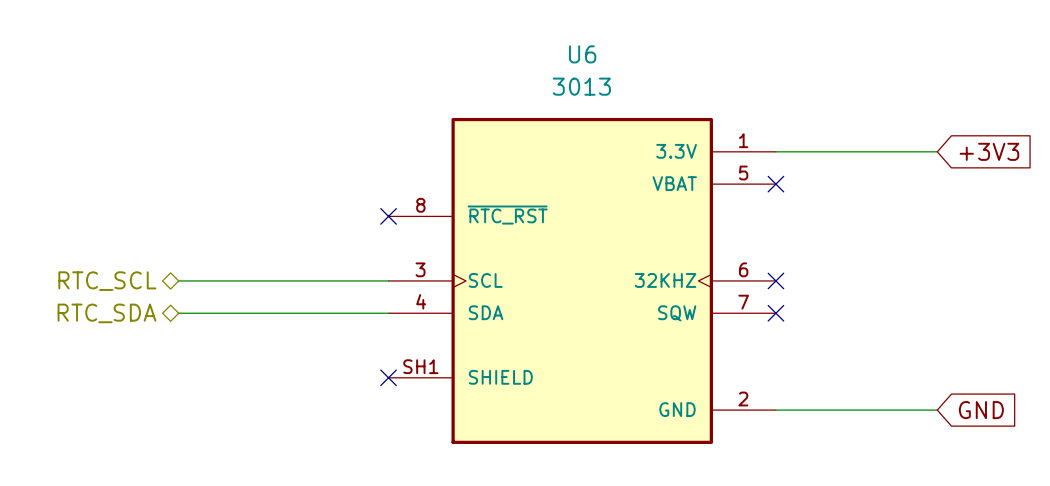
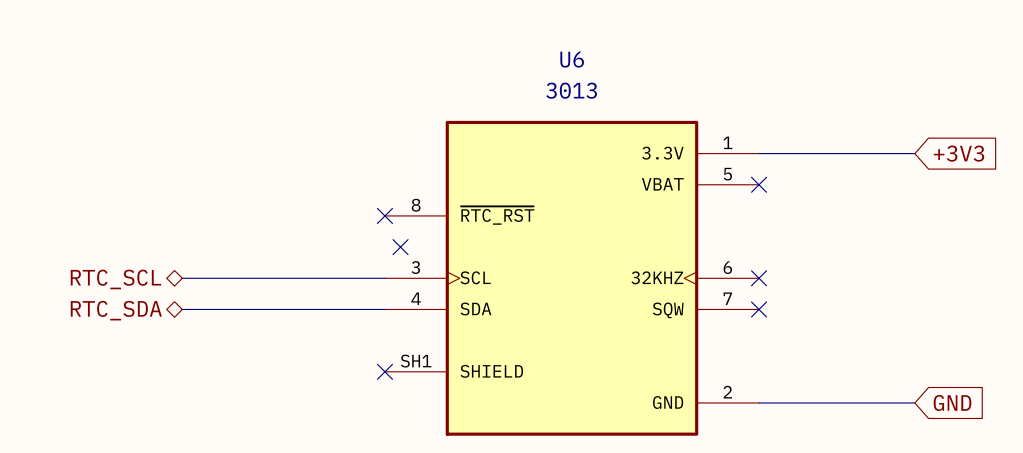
no-connect mark: none -> (400, 247)

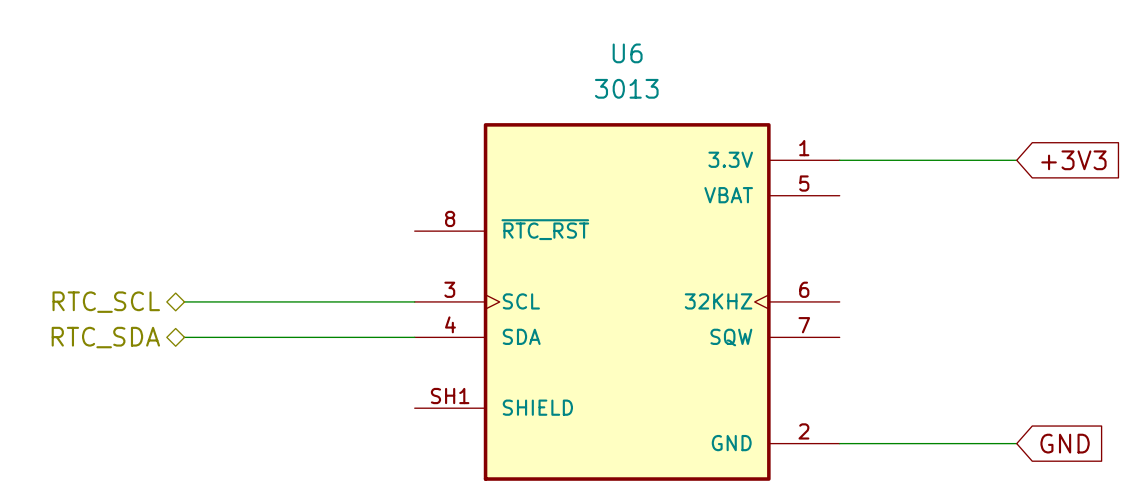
no-connect mark: (759, 184) -> none
no-connect mark: (384, 215) -> none
no-connect mark: (400, 247) -> none
no-connect mark: (759, 278) -> none
no-connect mark: (759, 309) -> none
no-connect mark: (384, 371) -> none

